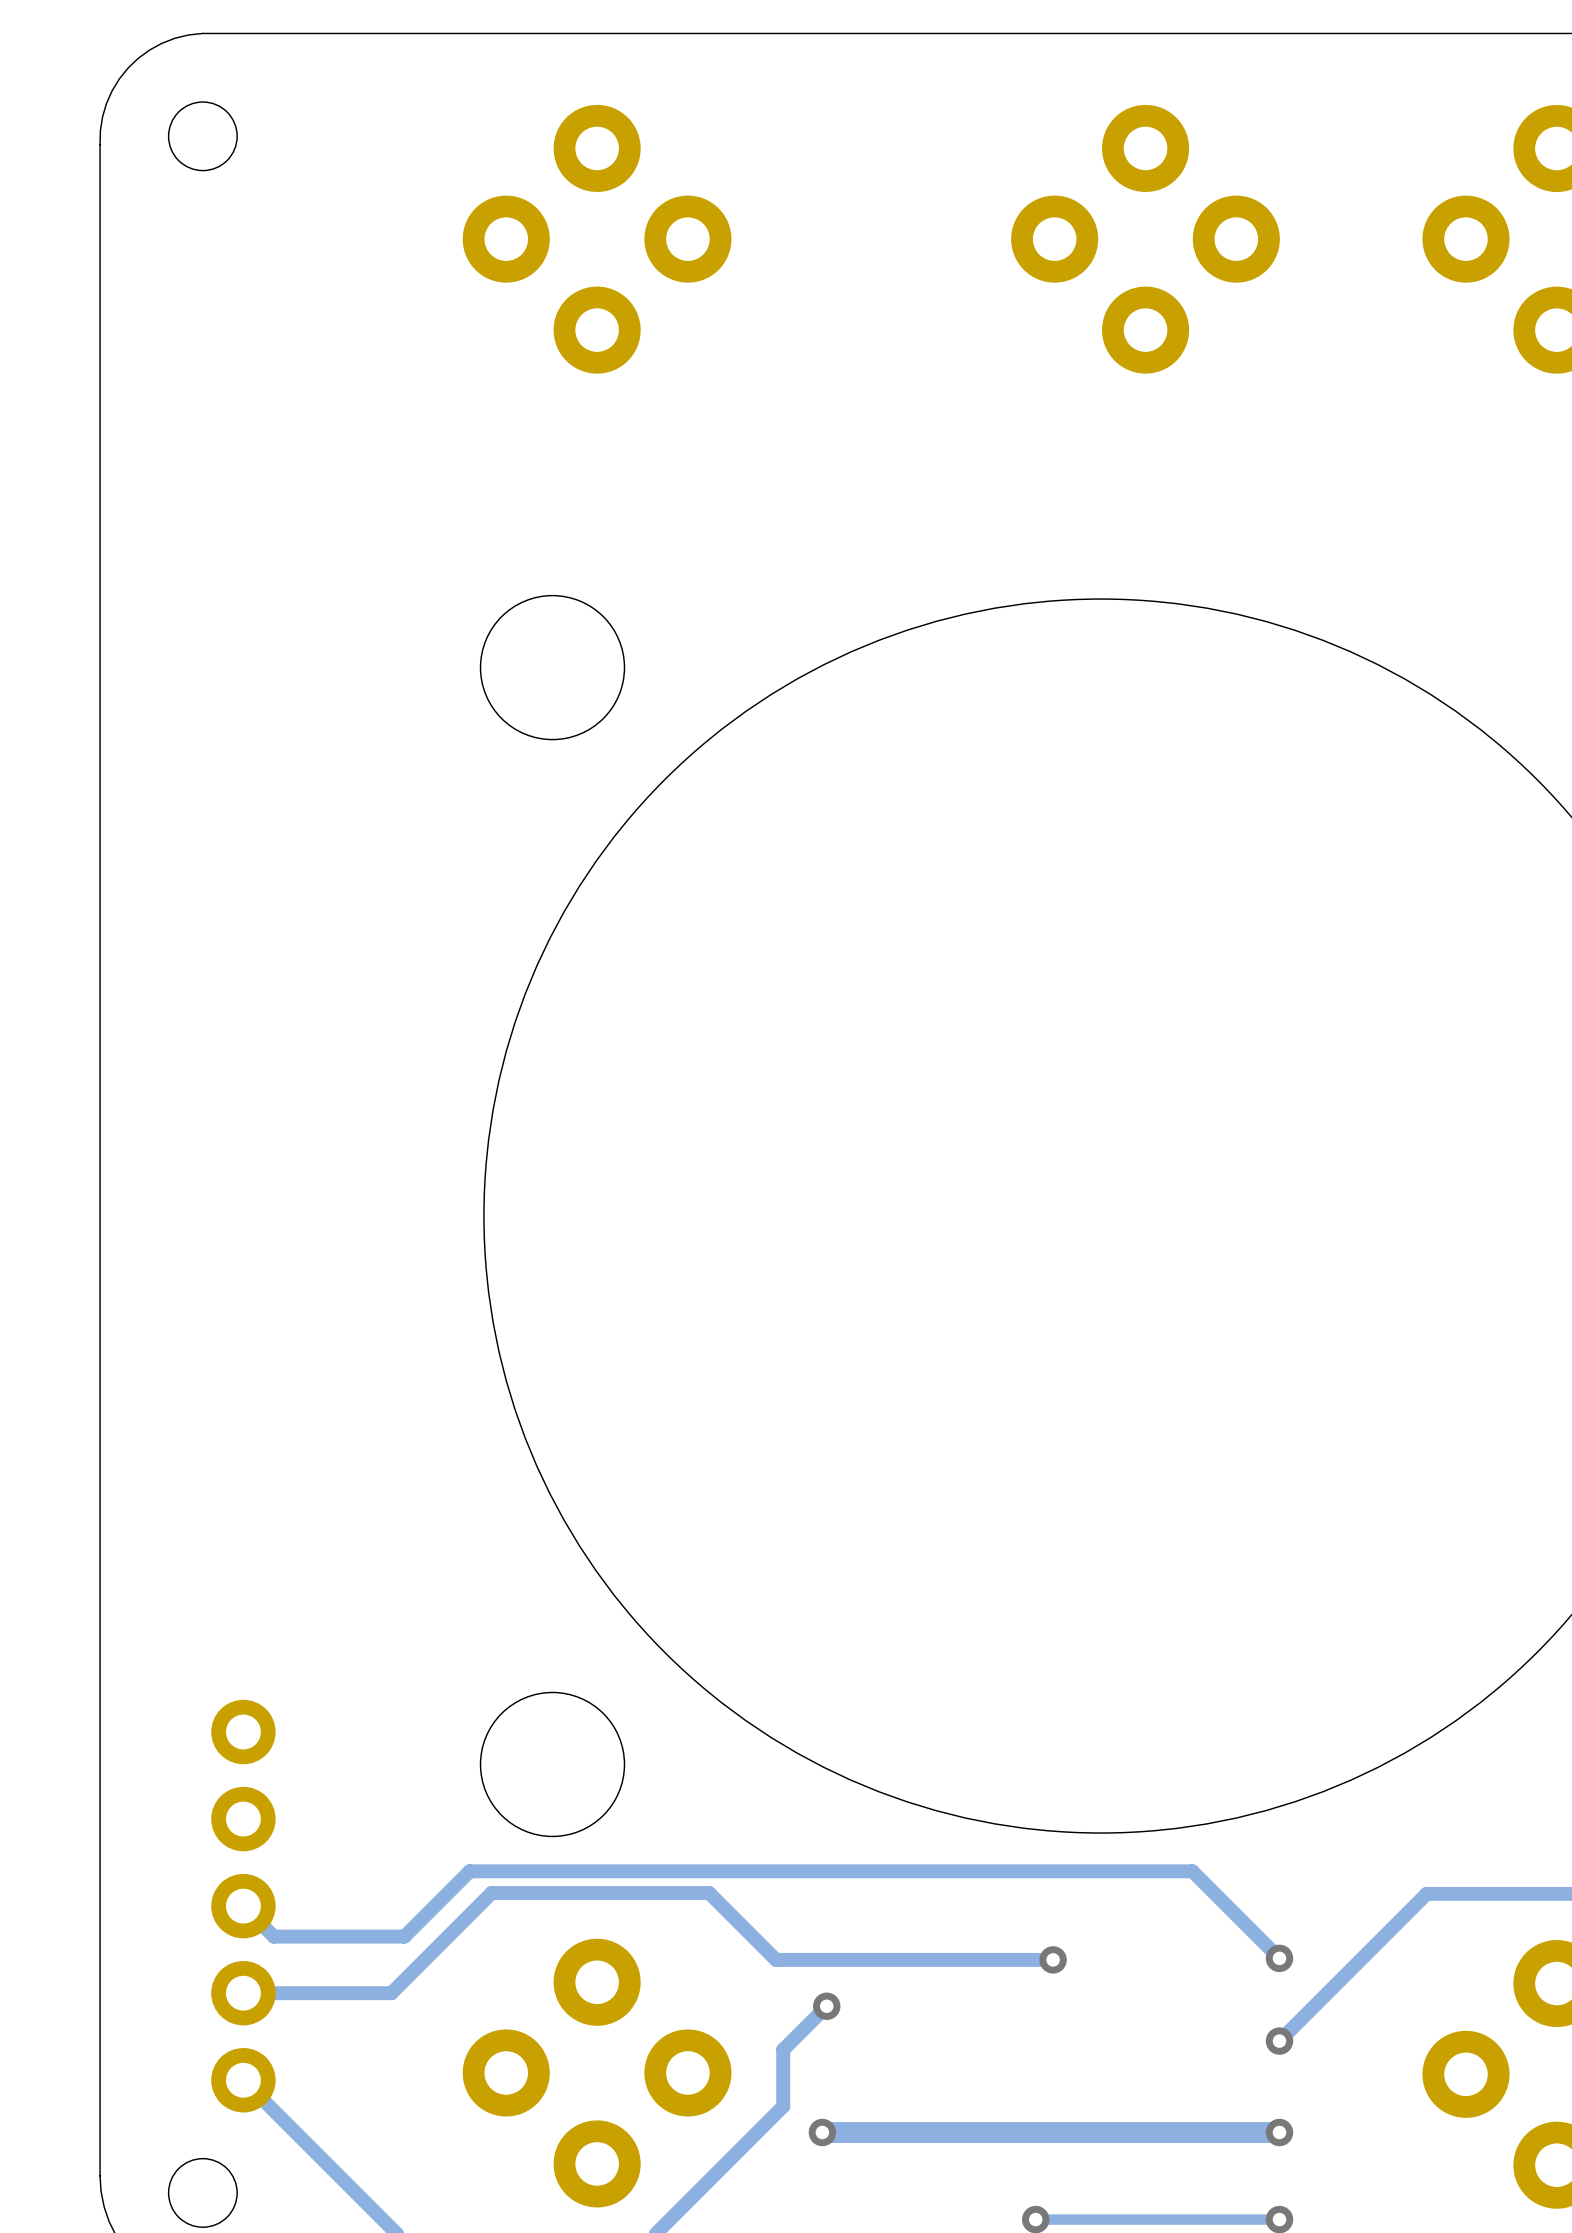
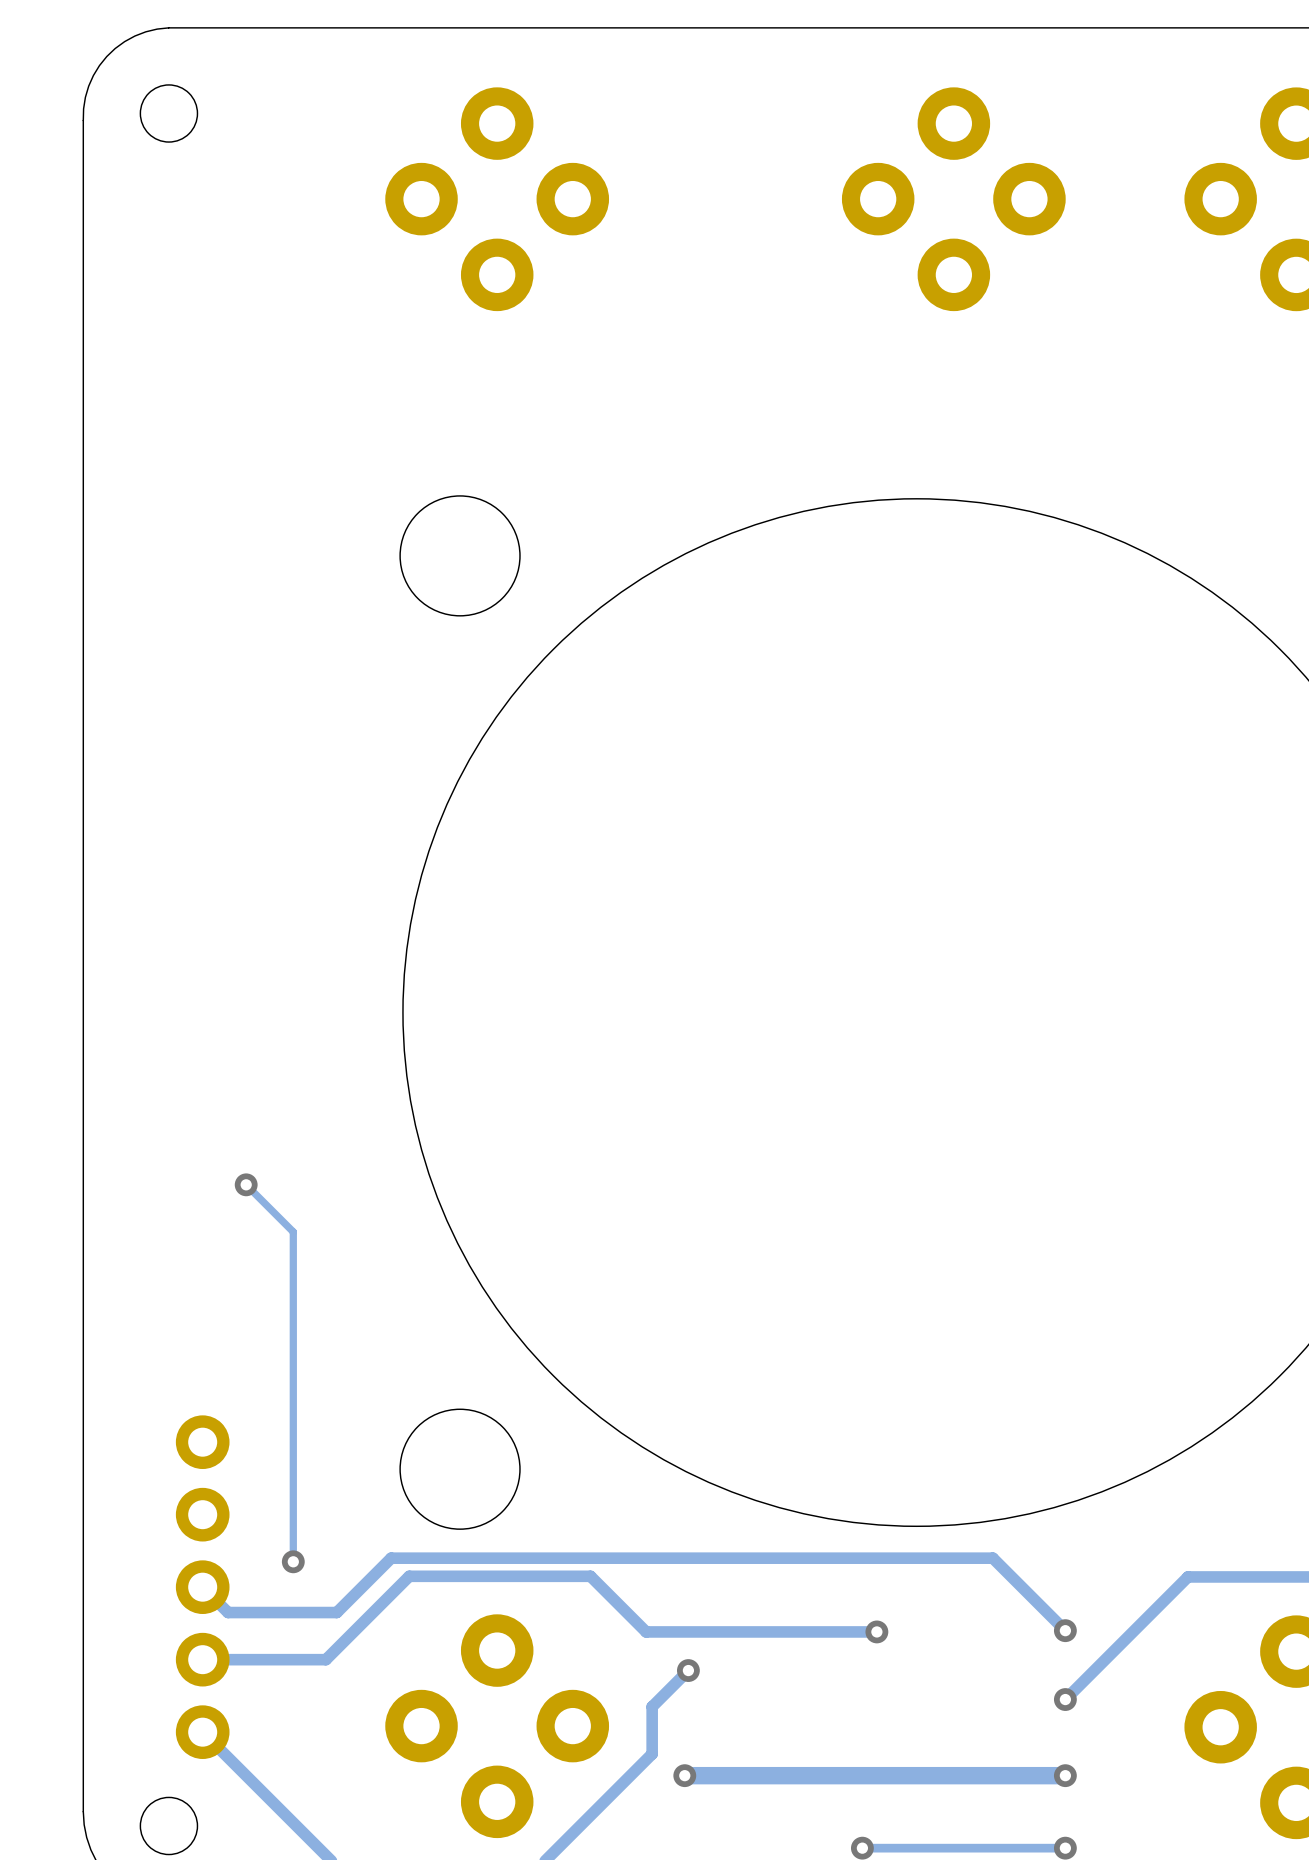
track: none -> (246, 1184) (293, 1231) (293, 1561)
via: none -> (246, 1184)
via: none -> (293, 1561)

